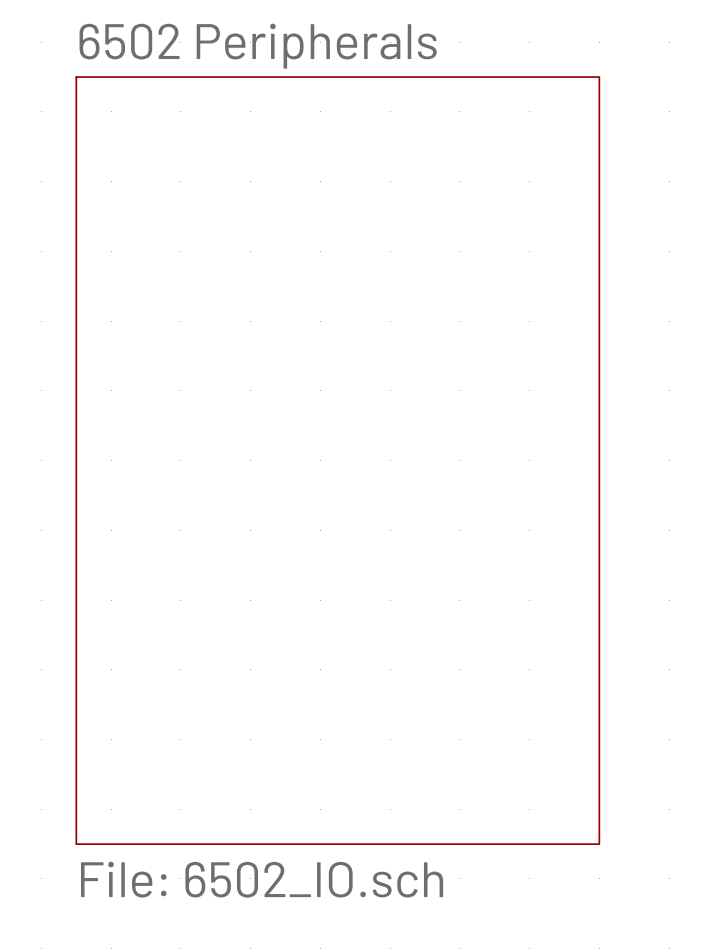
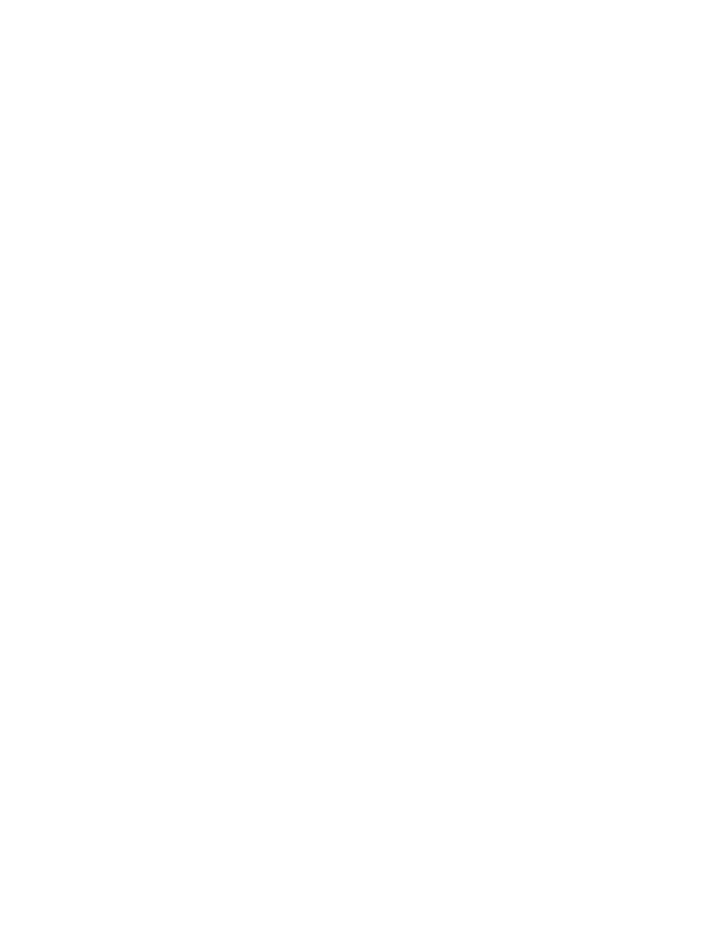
sheet 6502 Peripherals: File: 6502_IO.sch (337, 460) -> none

